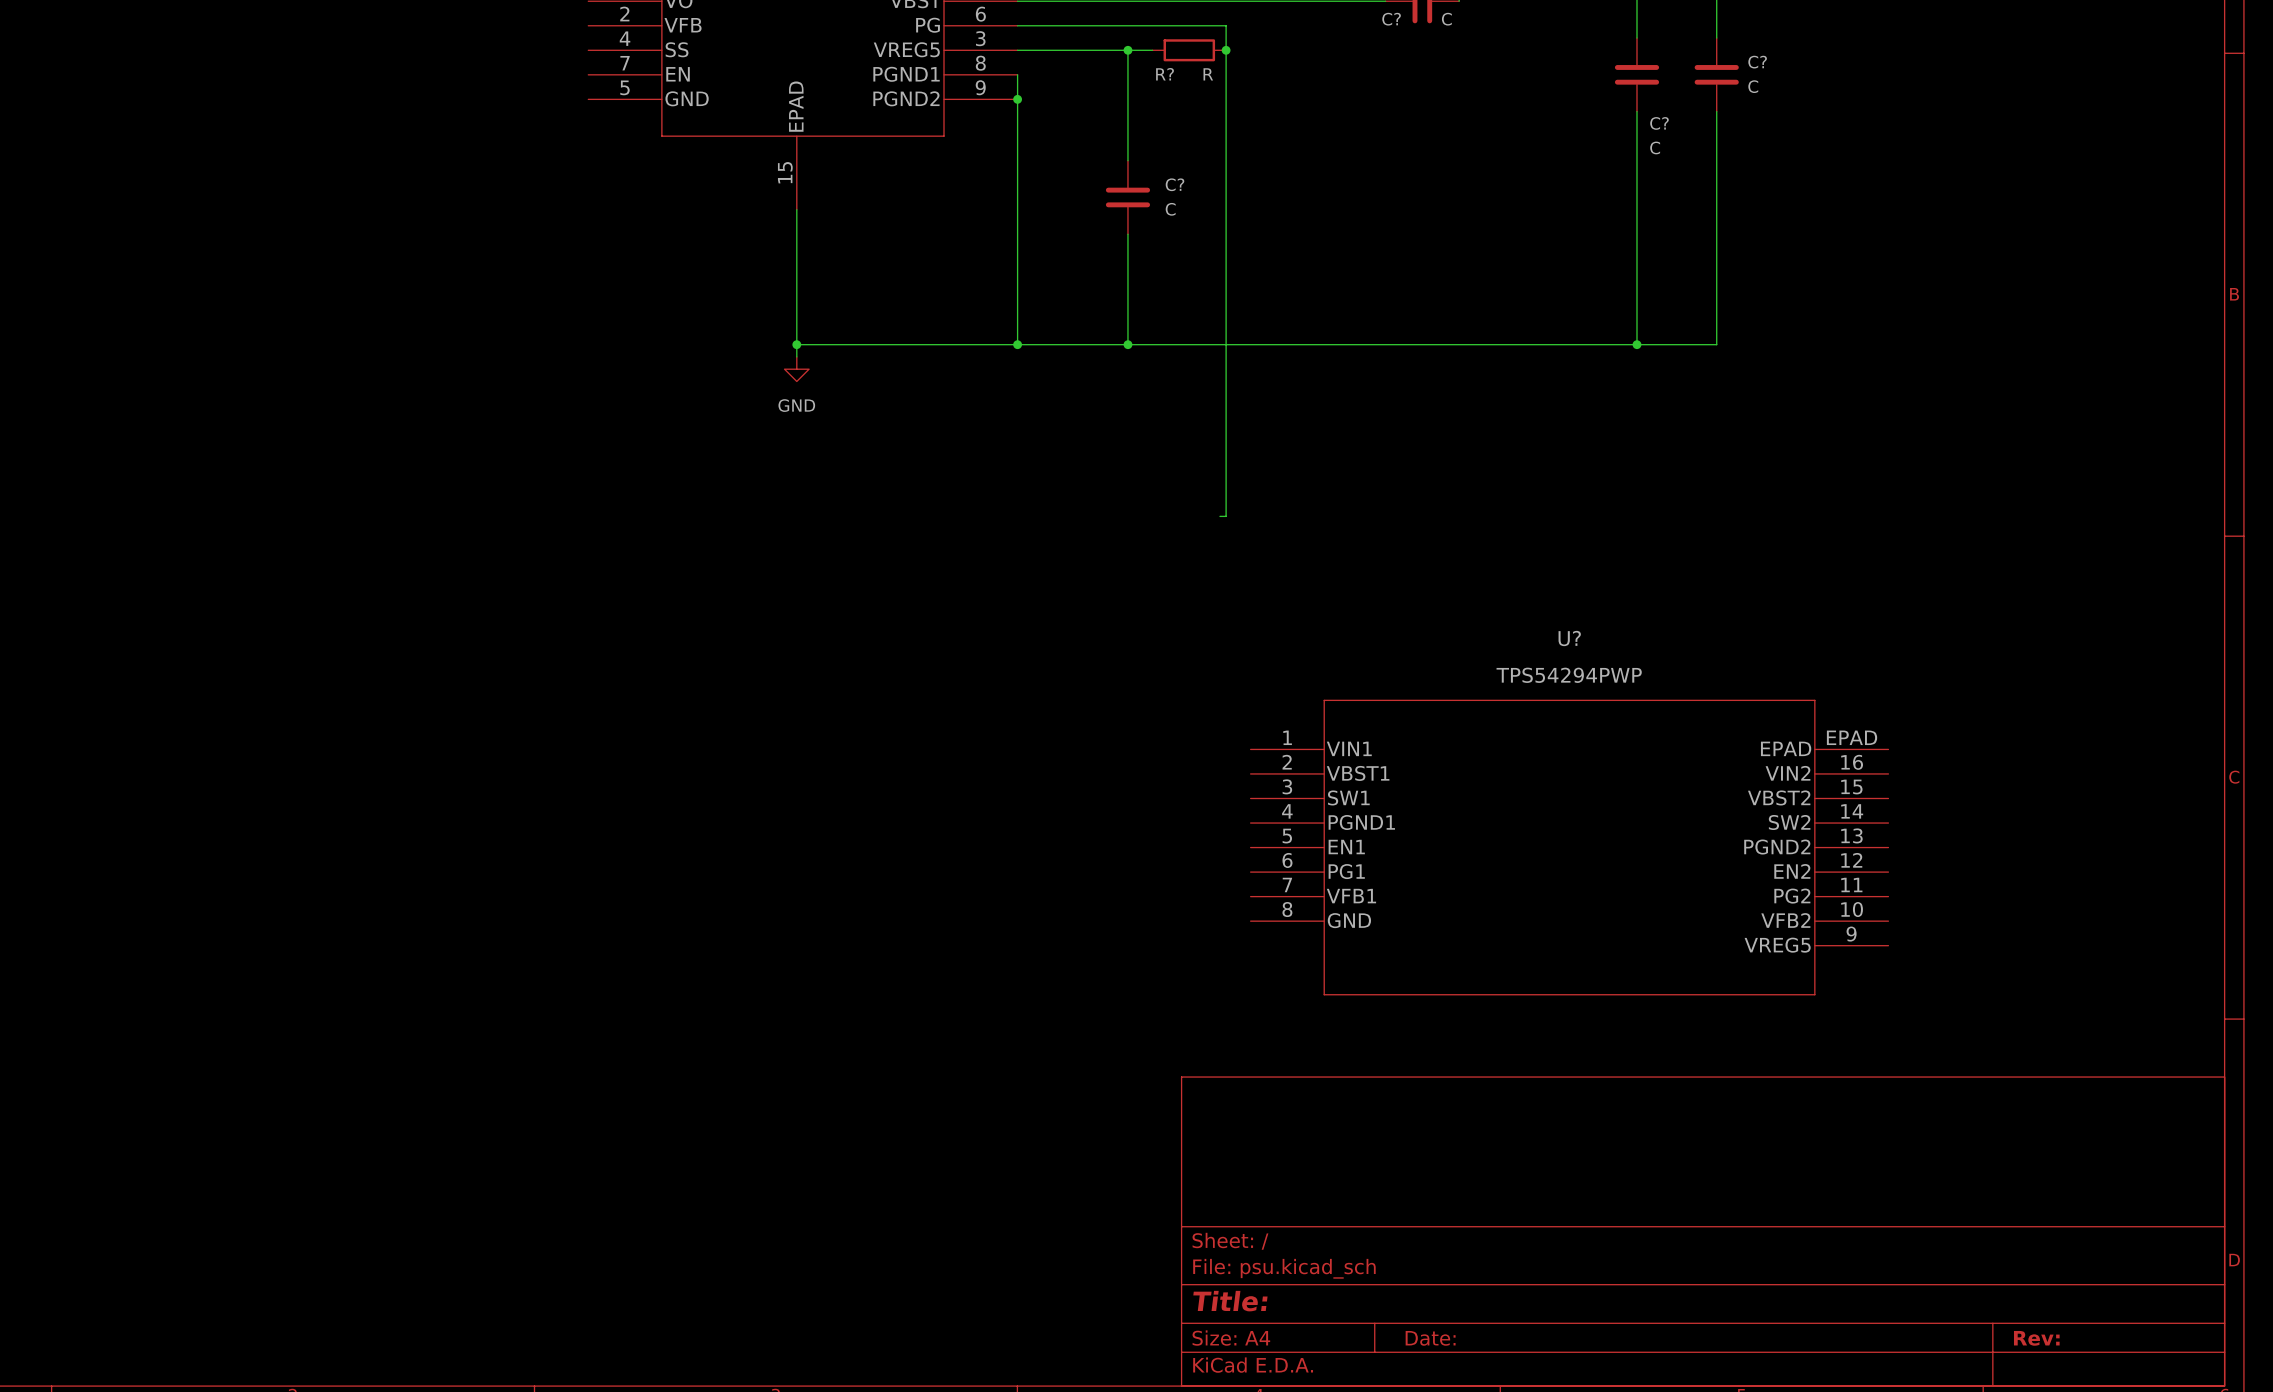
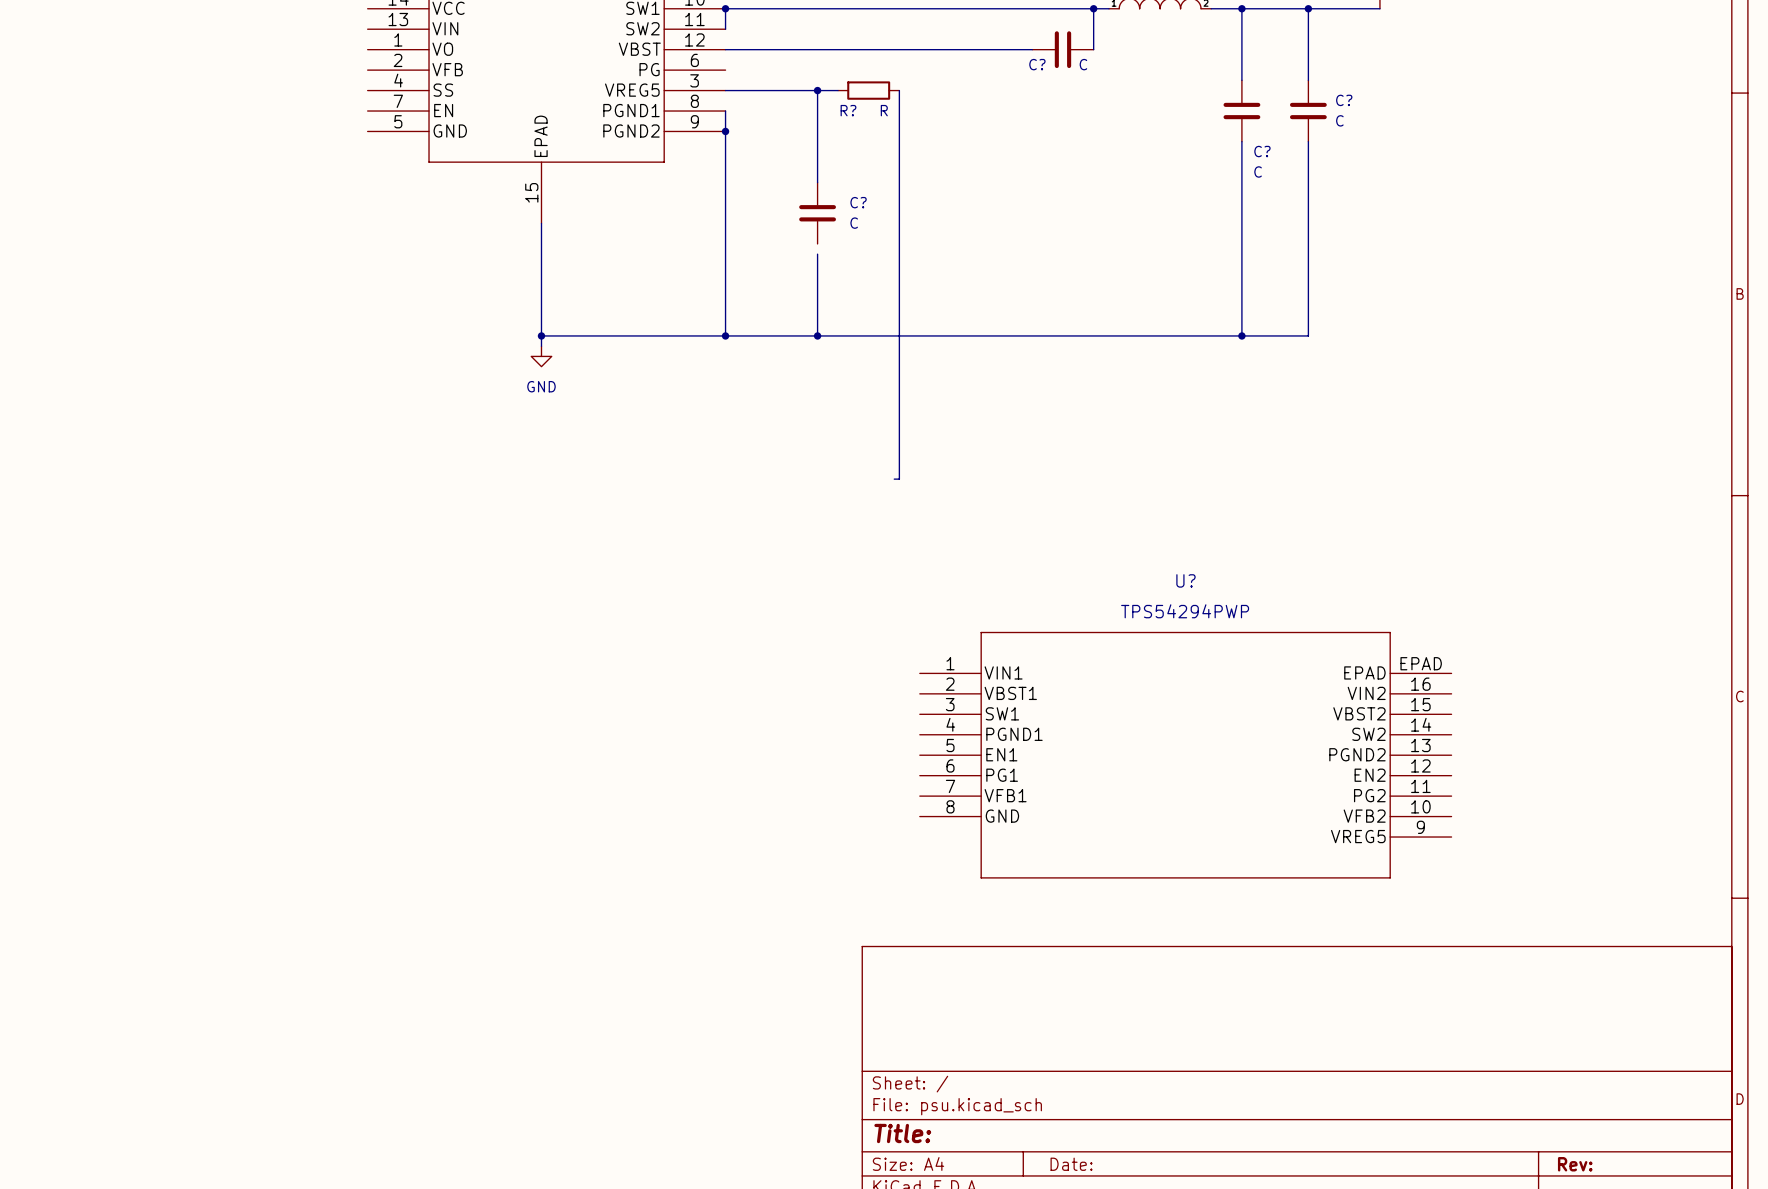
wire: (1017, 25) (1226, 25) (1226, 50) -> none
junction: (1226, 50) -> none
wire: (1127, 234) (1127, 246) -> none

